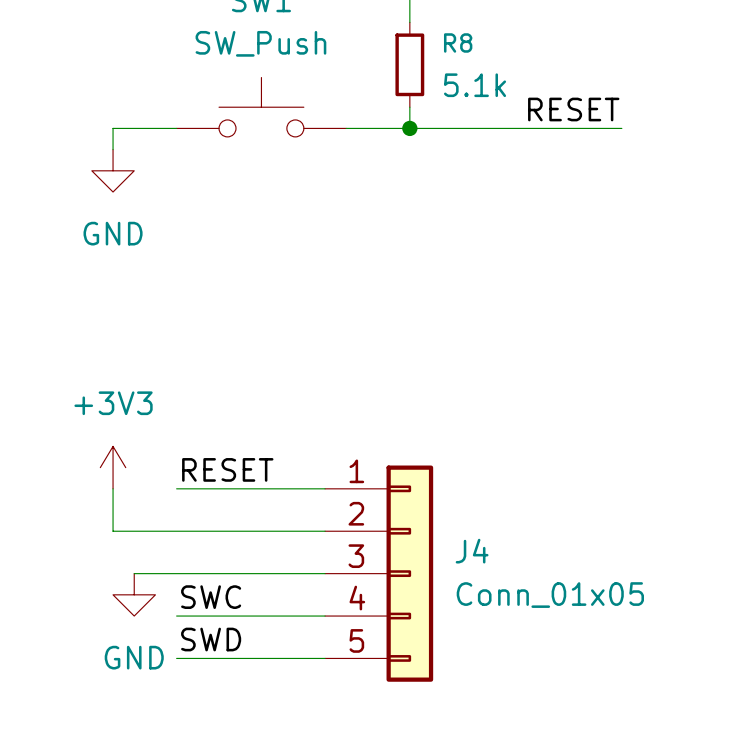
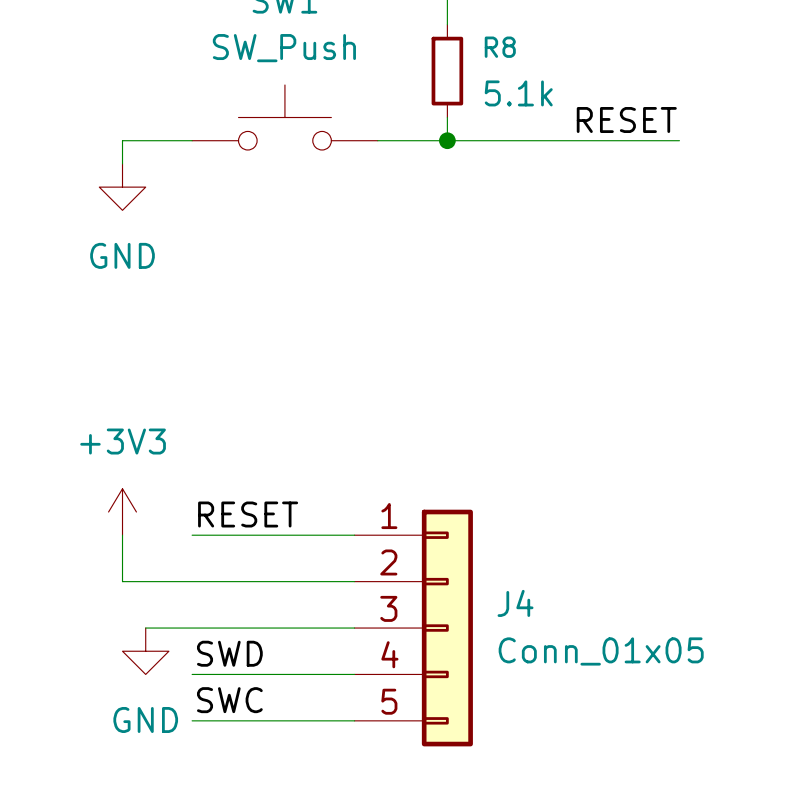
label: SWC (211, 597) -> SWD (229, 653)
label: SWD (211, 639) -> SWC (229, 700)

